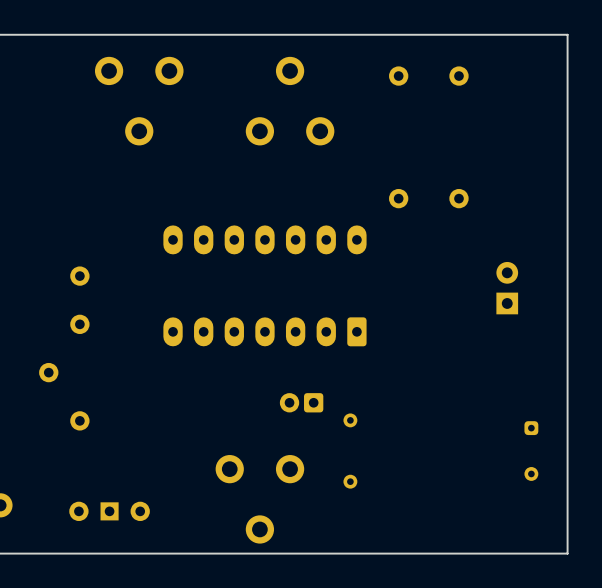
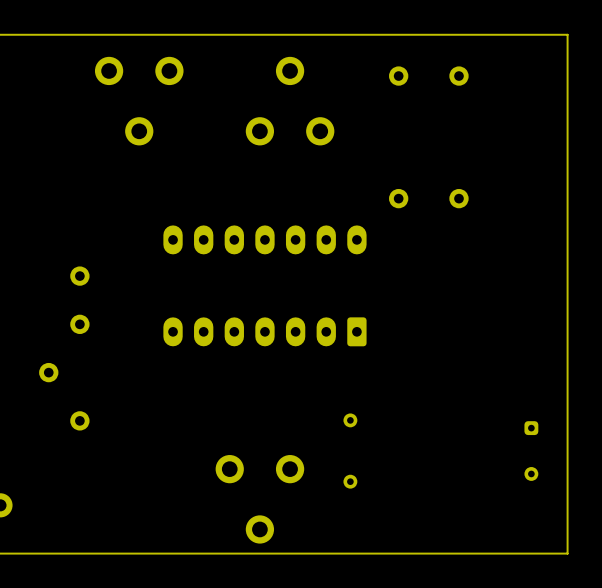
part: (507, 288) -> none
part: (301, 402) -> none
part: (109, 511) -> none

